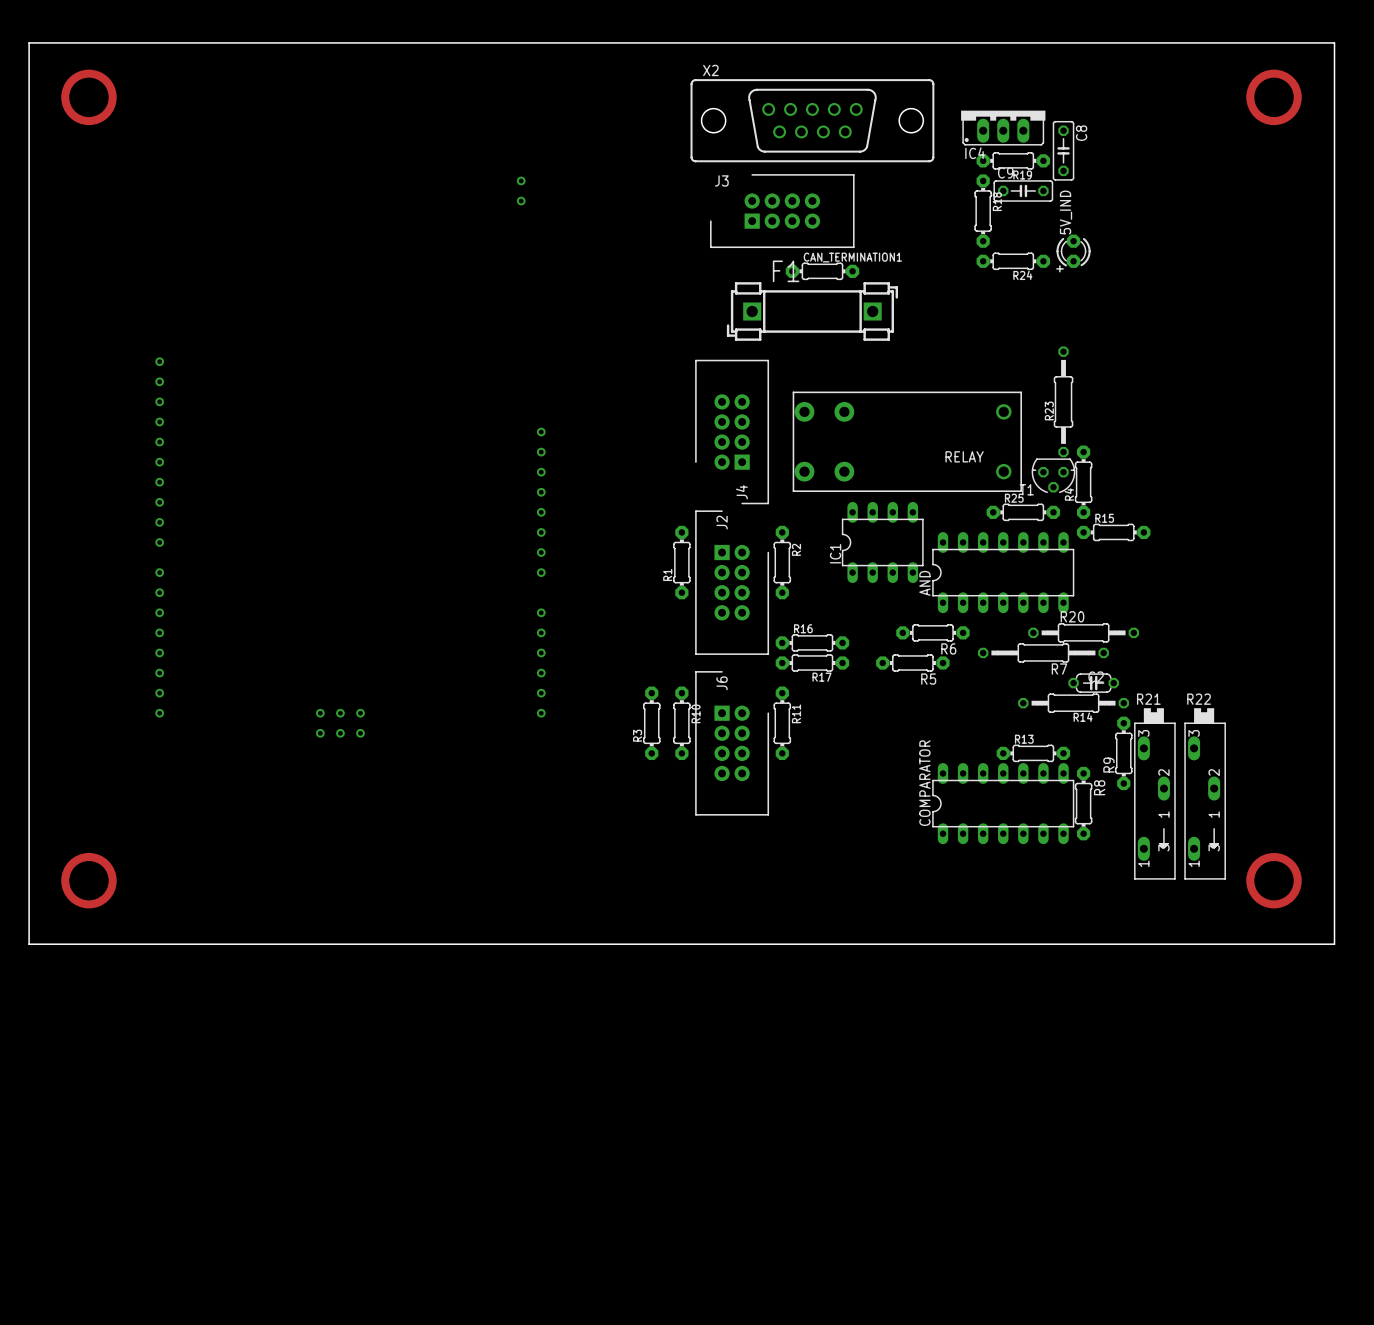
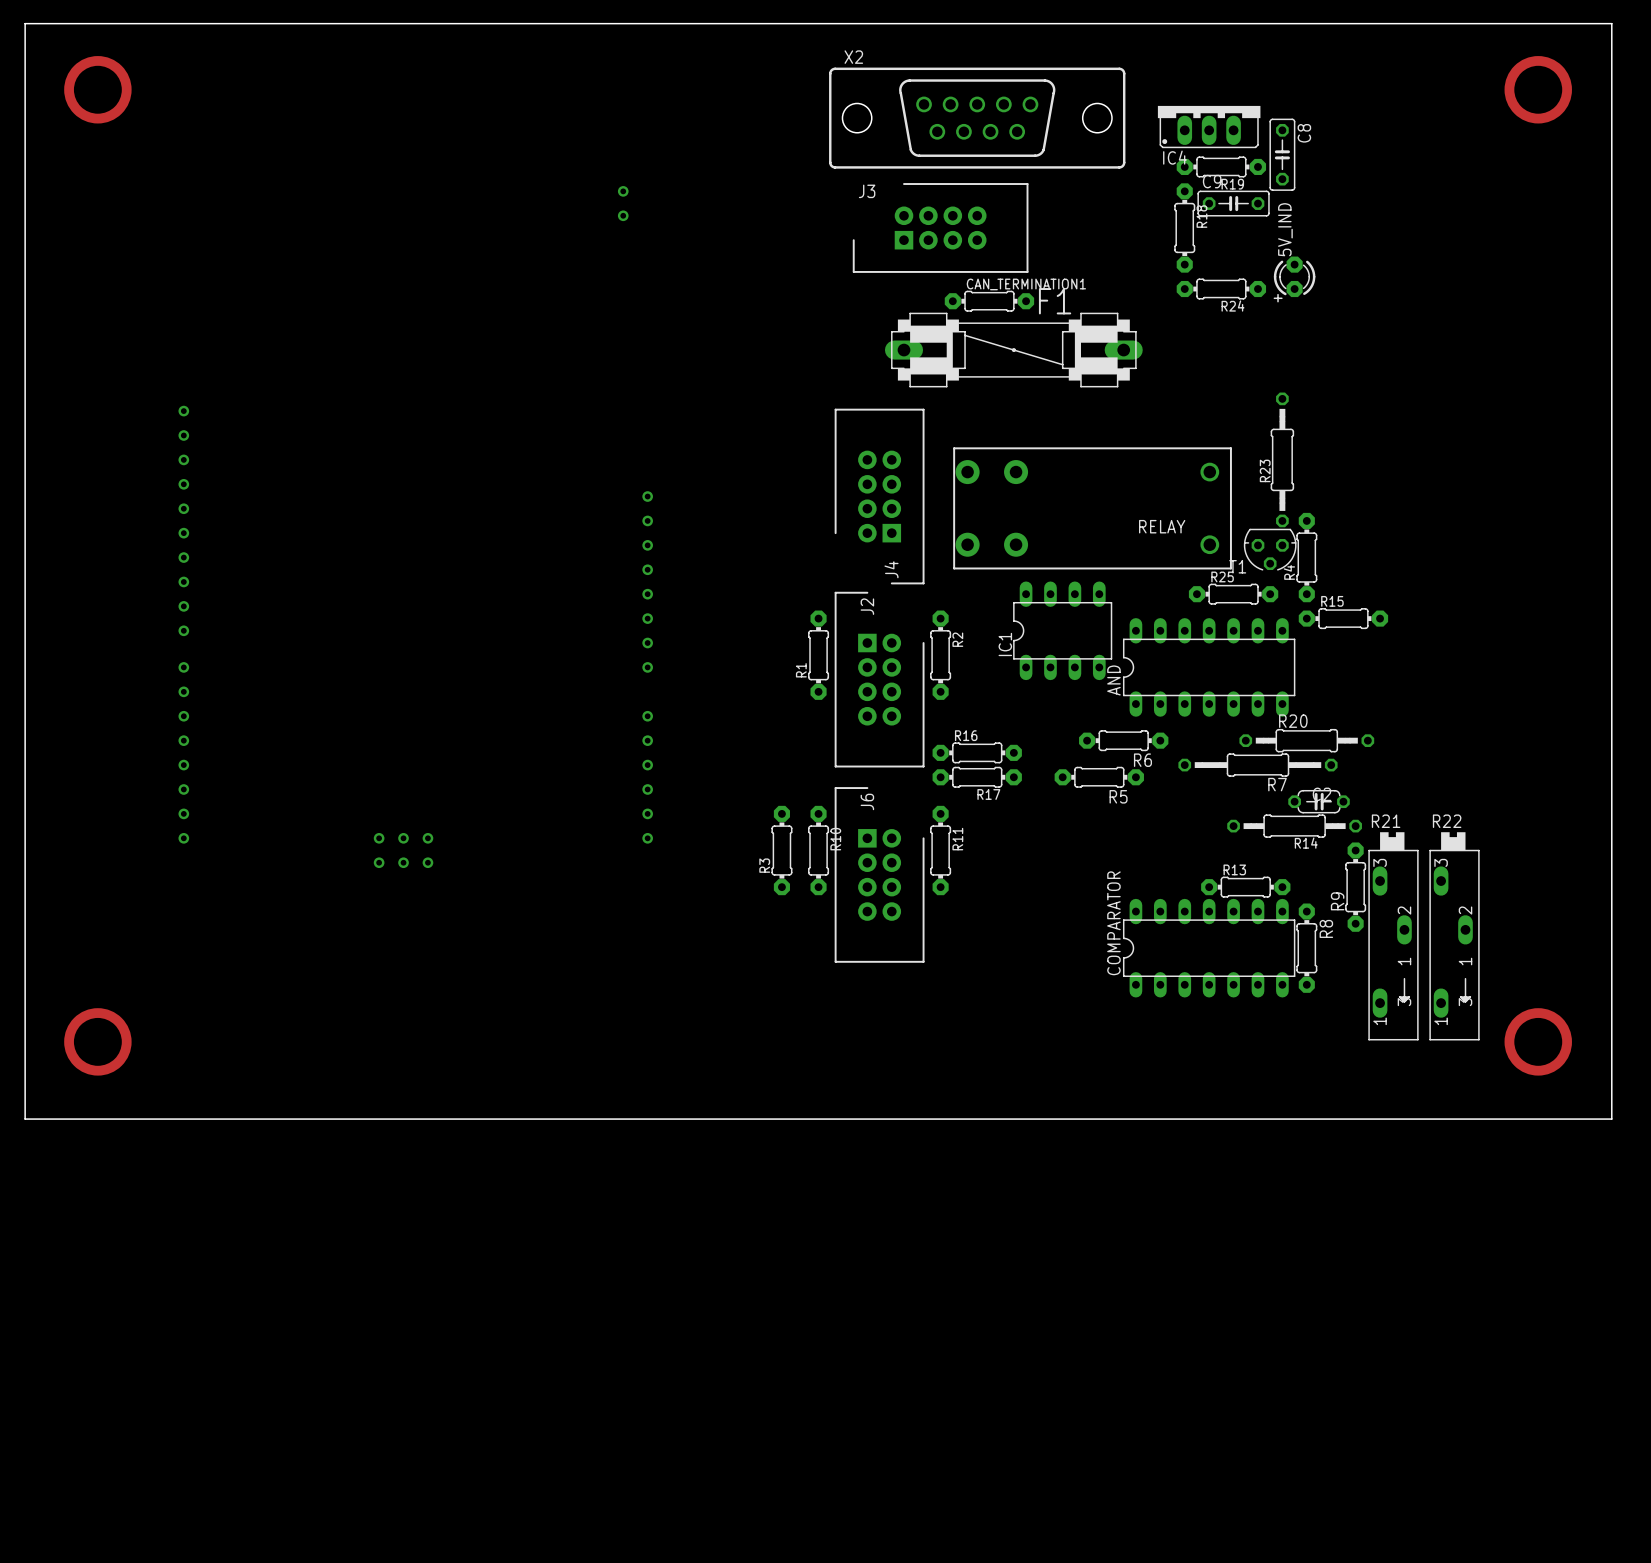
F1 name position: F1 (786, 271) -> F1 (1055, 301)
F1 footprint: [726, 282, 899, 341] -> [884, 312, 1143, 388]

